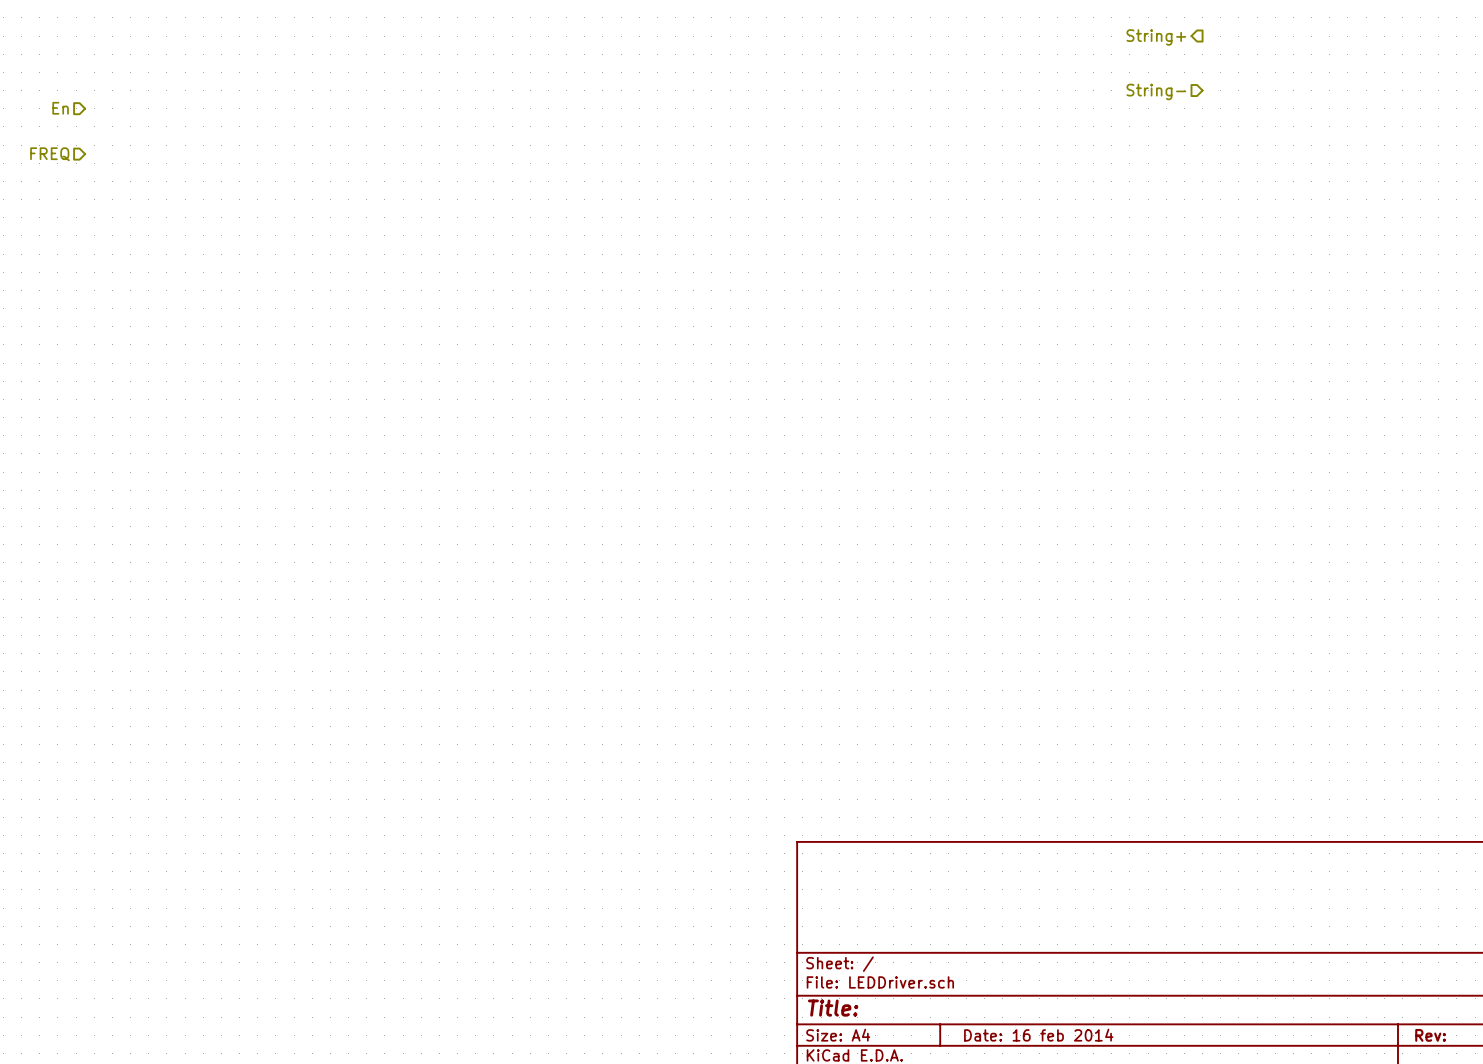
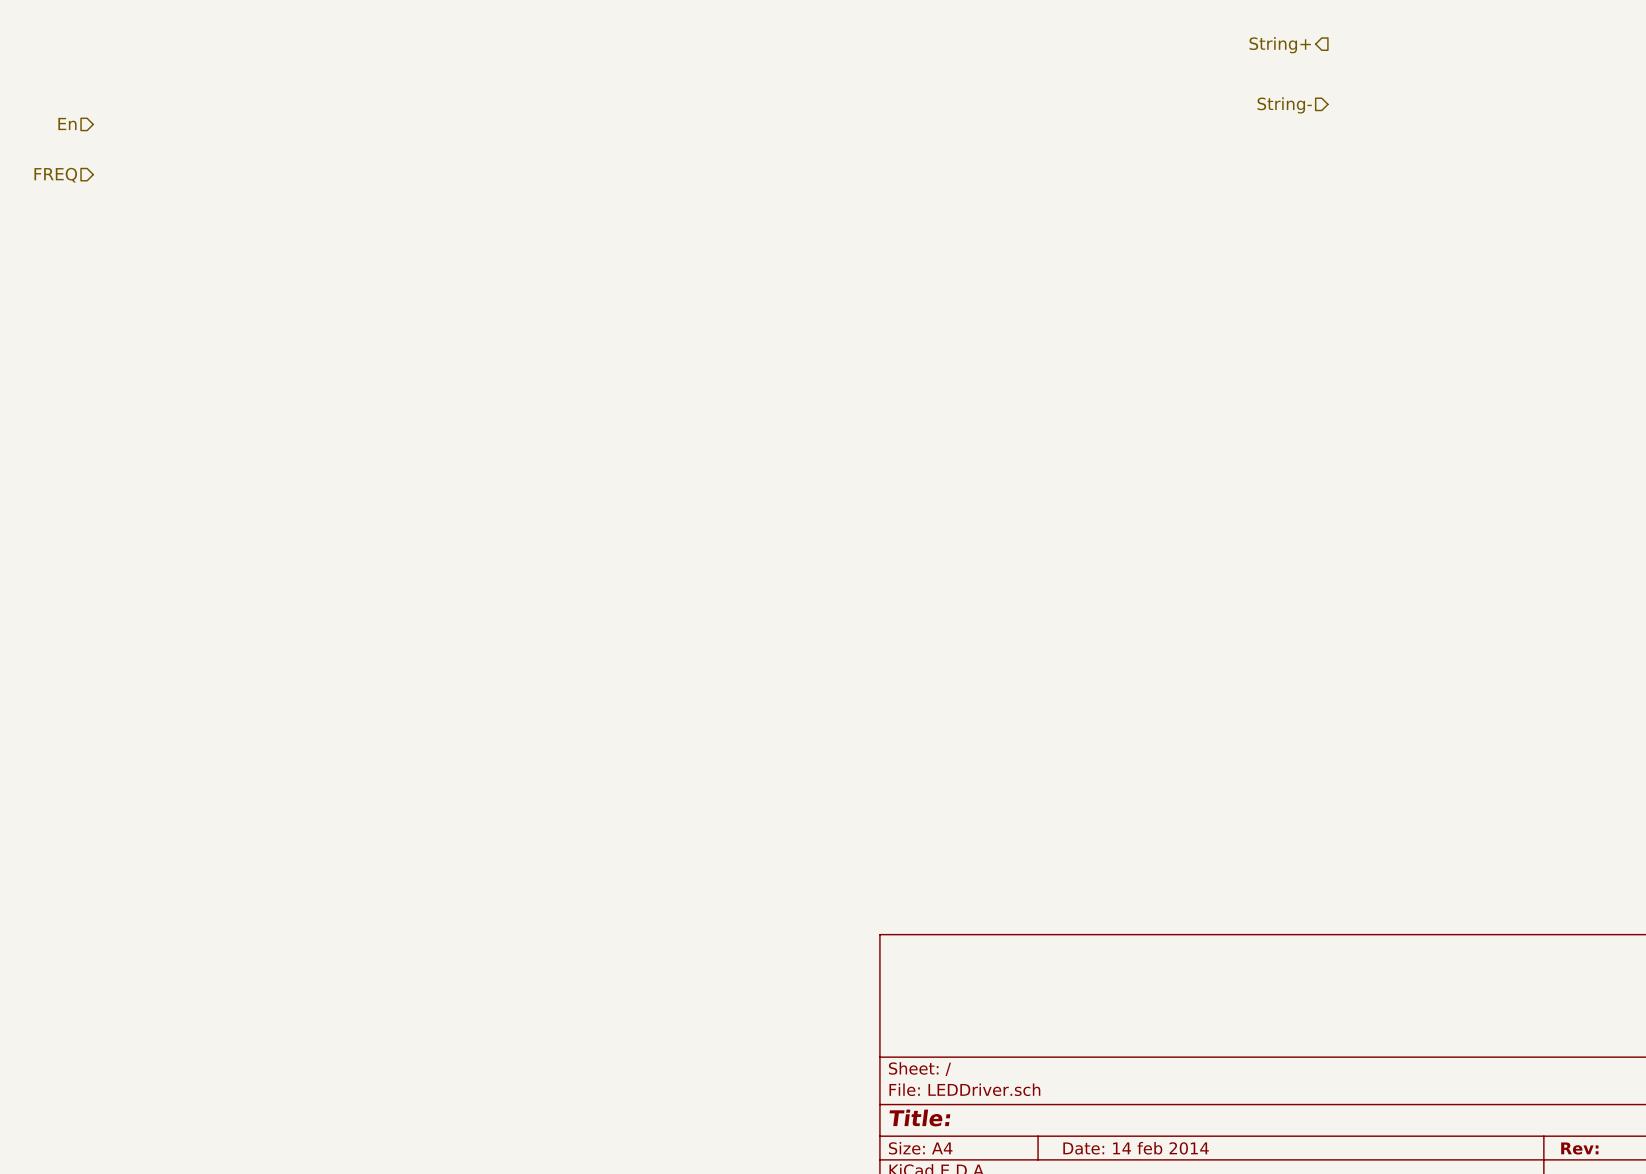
title block: Date: 16 feb 2014 (1038, 1035) -> Date: 14 feb 2014 (1136, 1148)

